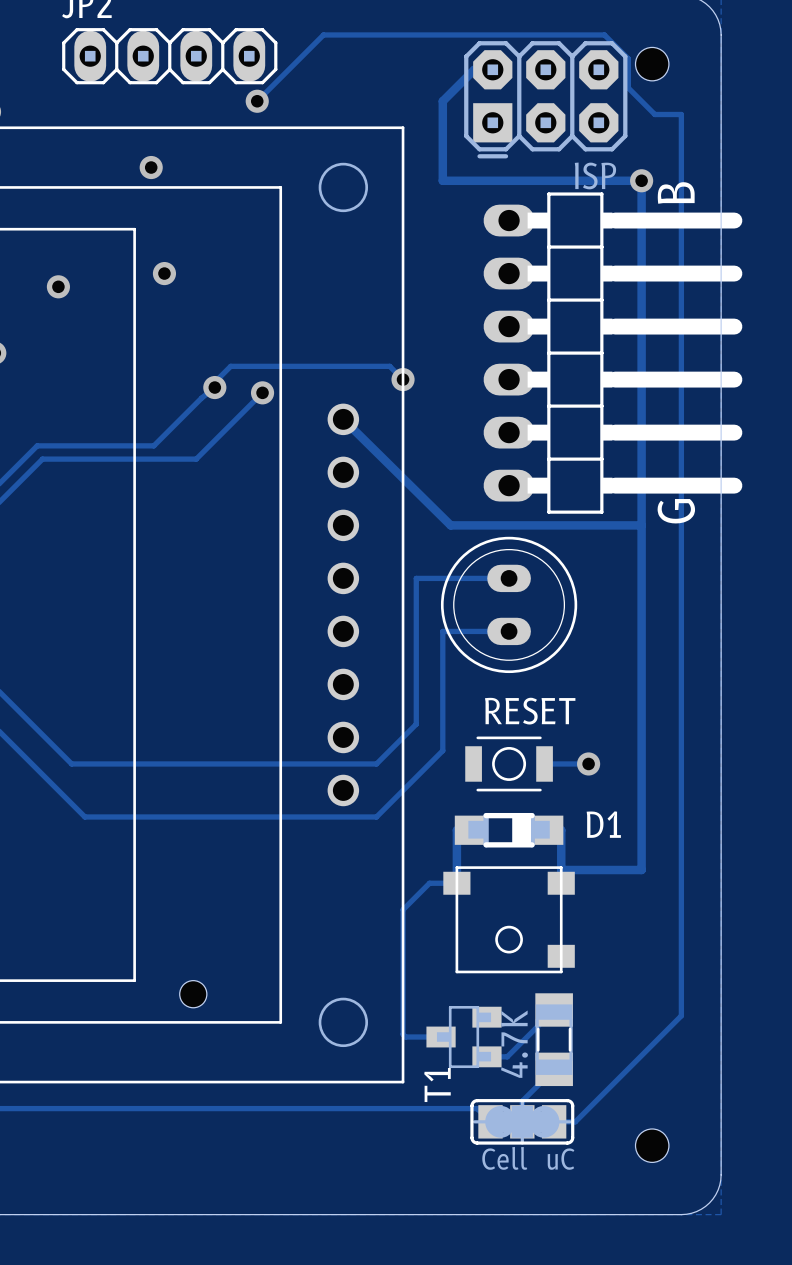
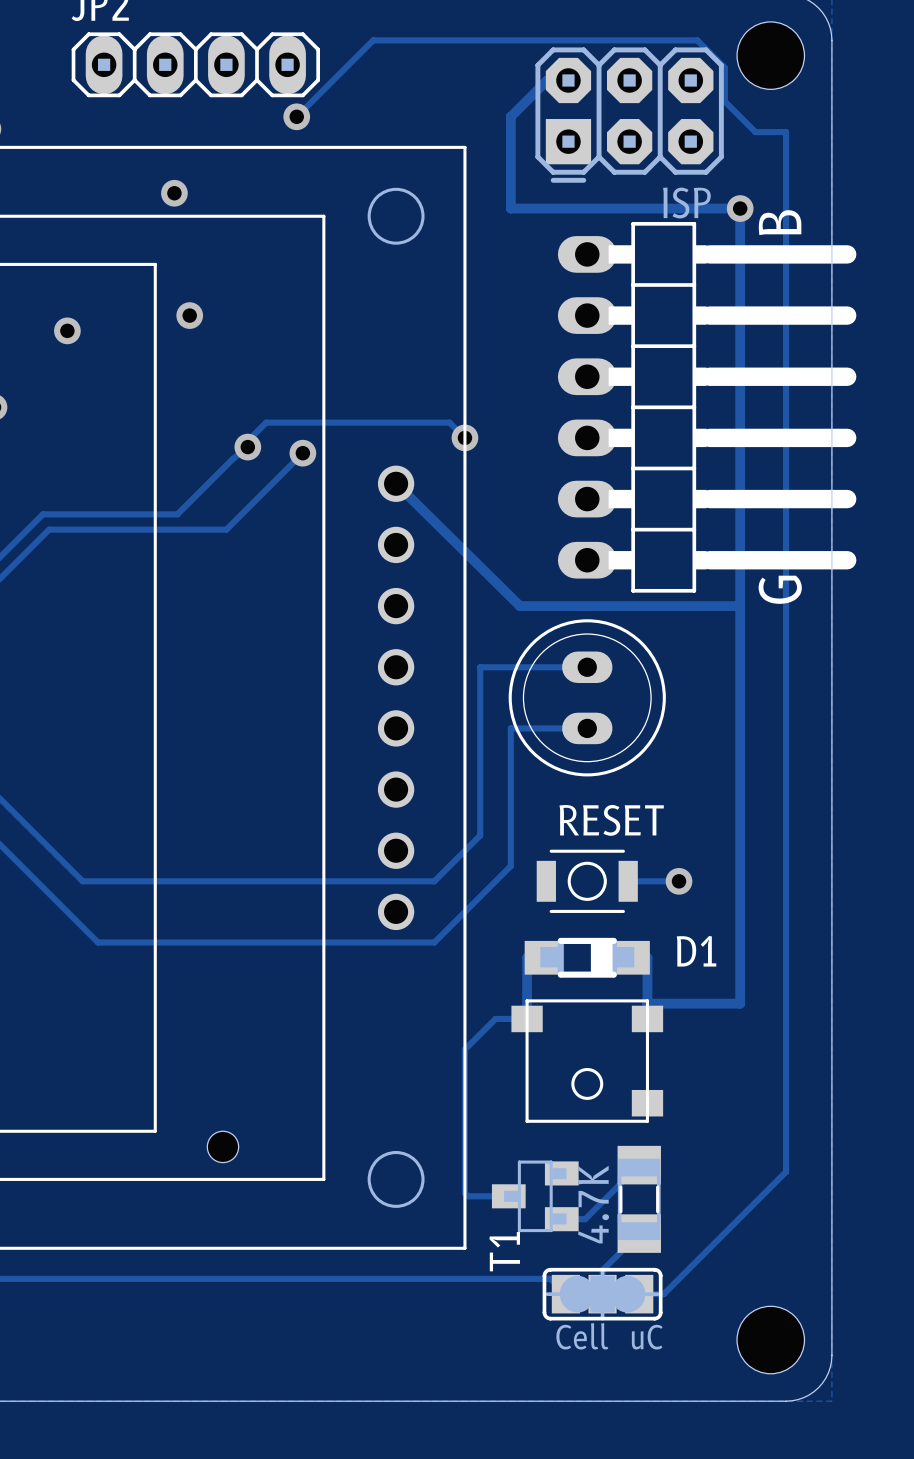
hole: none -> (770, 55)
hole: (652, 64) -> none
hole: (652, 1145) -> none
hole: none -> (770, 1340)

